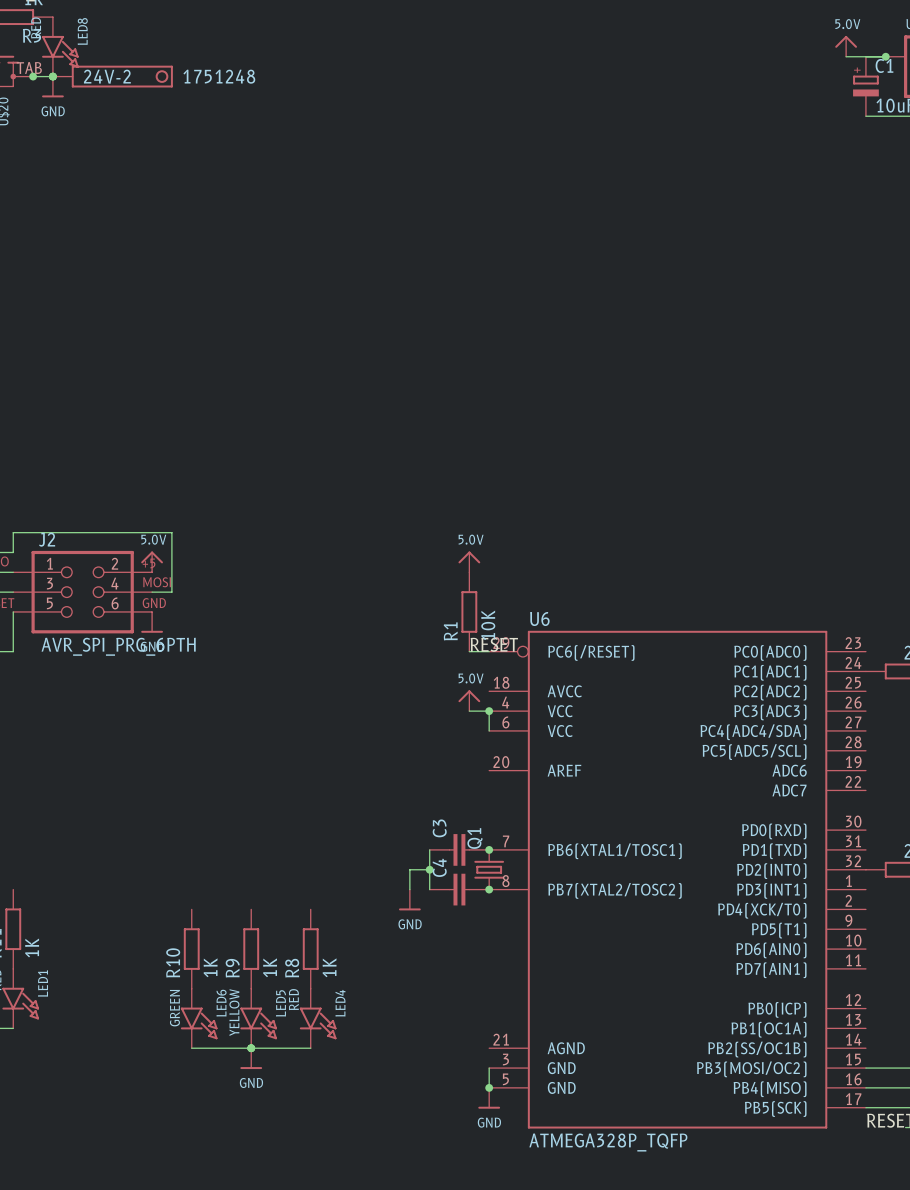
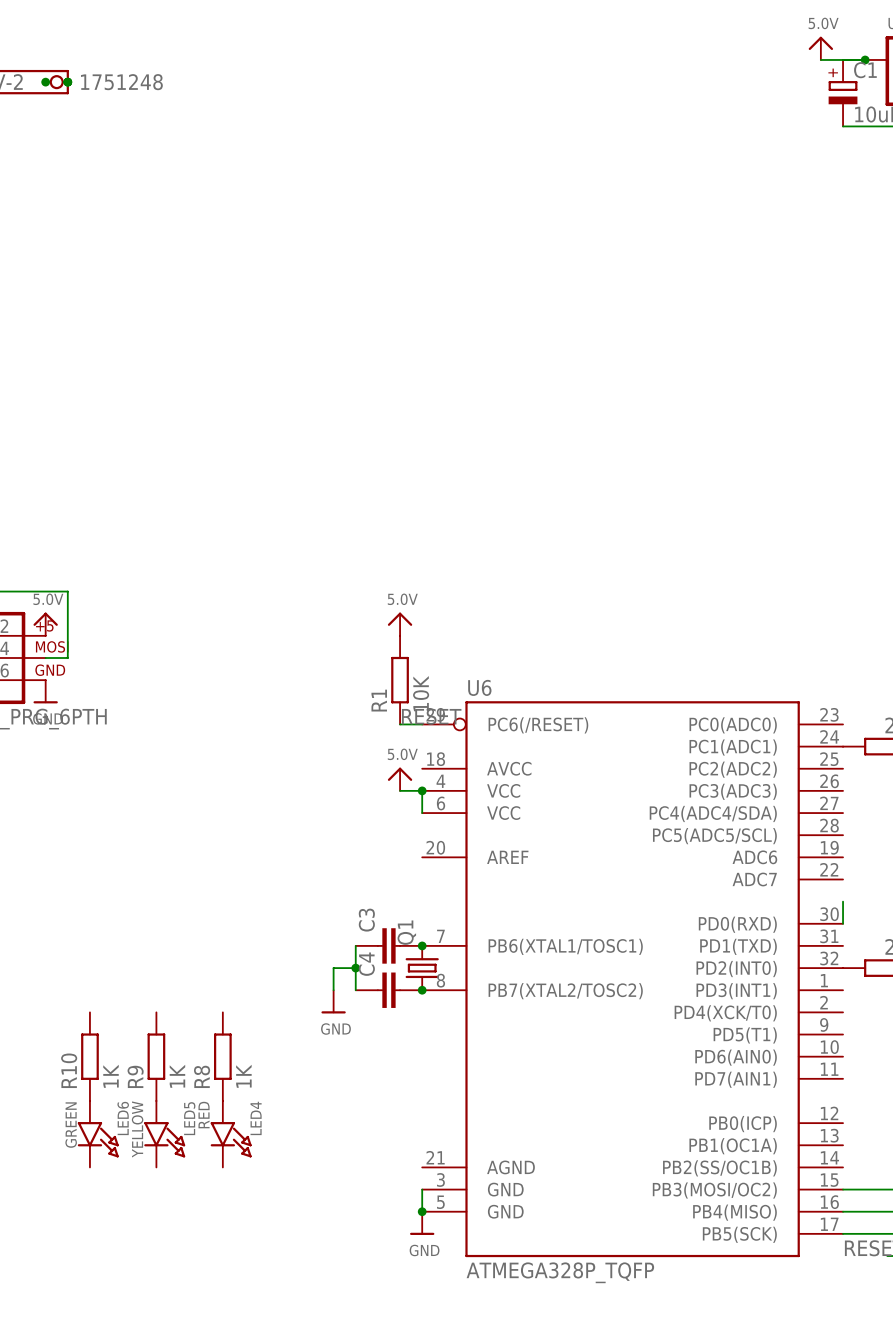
junction: none -> (45, 82)
junction: none -> (67, 82)
wire: none -> (843, 901) (843, 923)
wire: (191, 1048) (310, 1048) -> none
junction: (251, 1048) -> none
power symbol: GND (251, 1058) -> none

